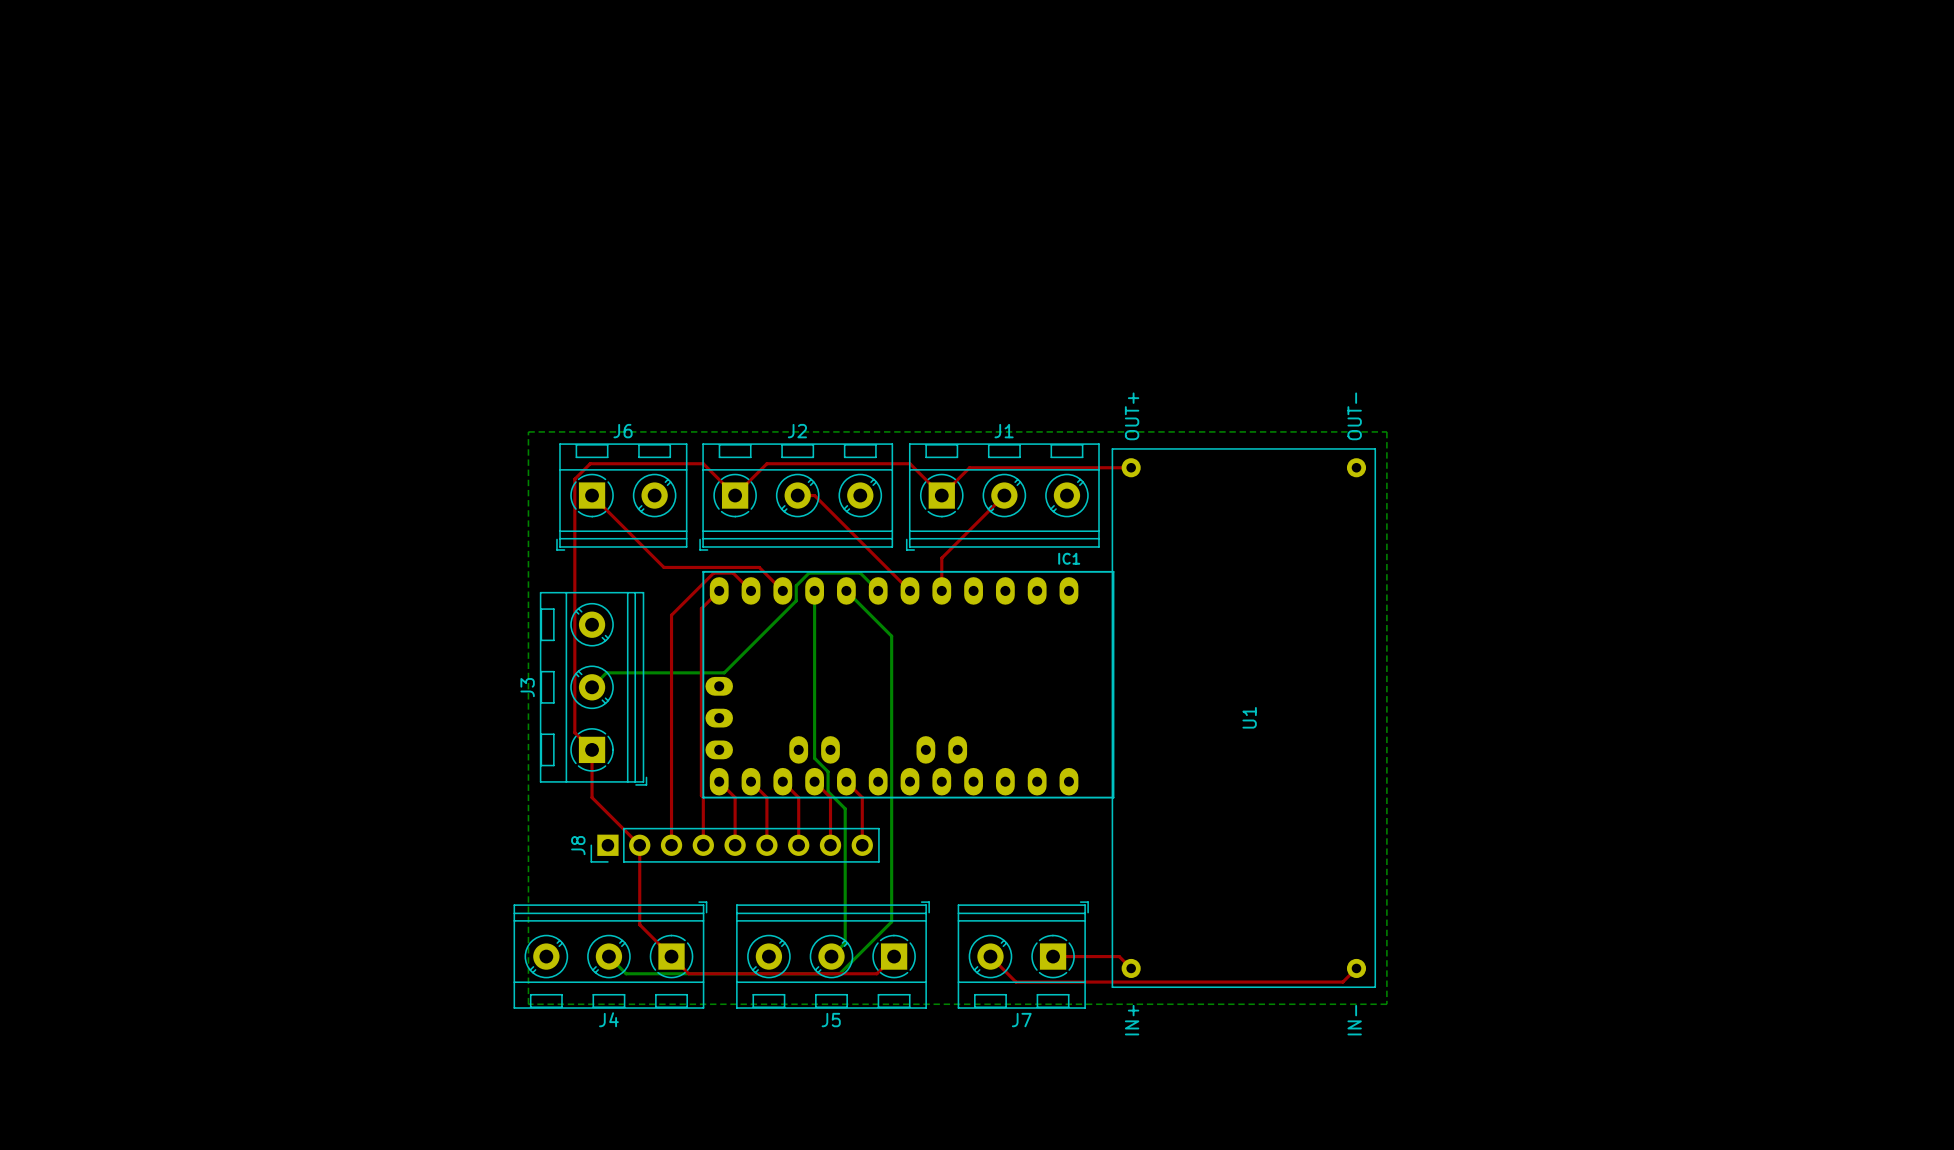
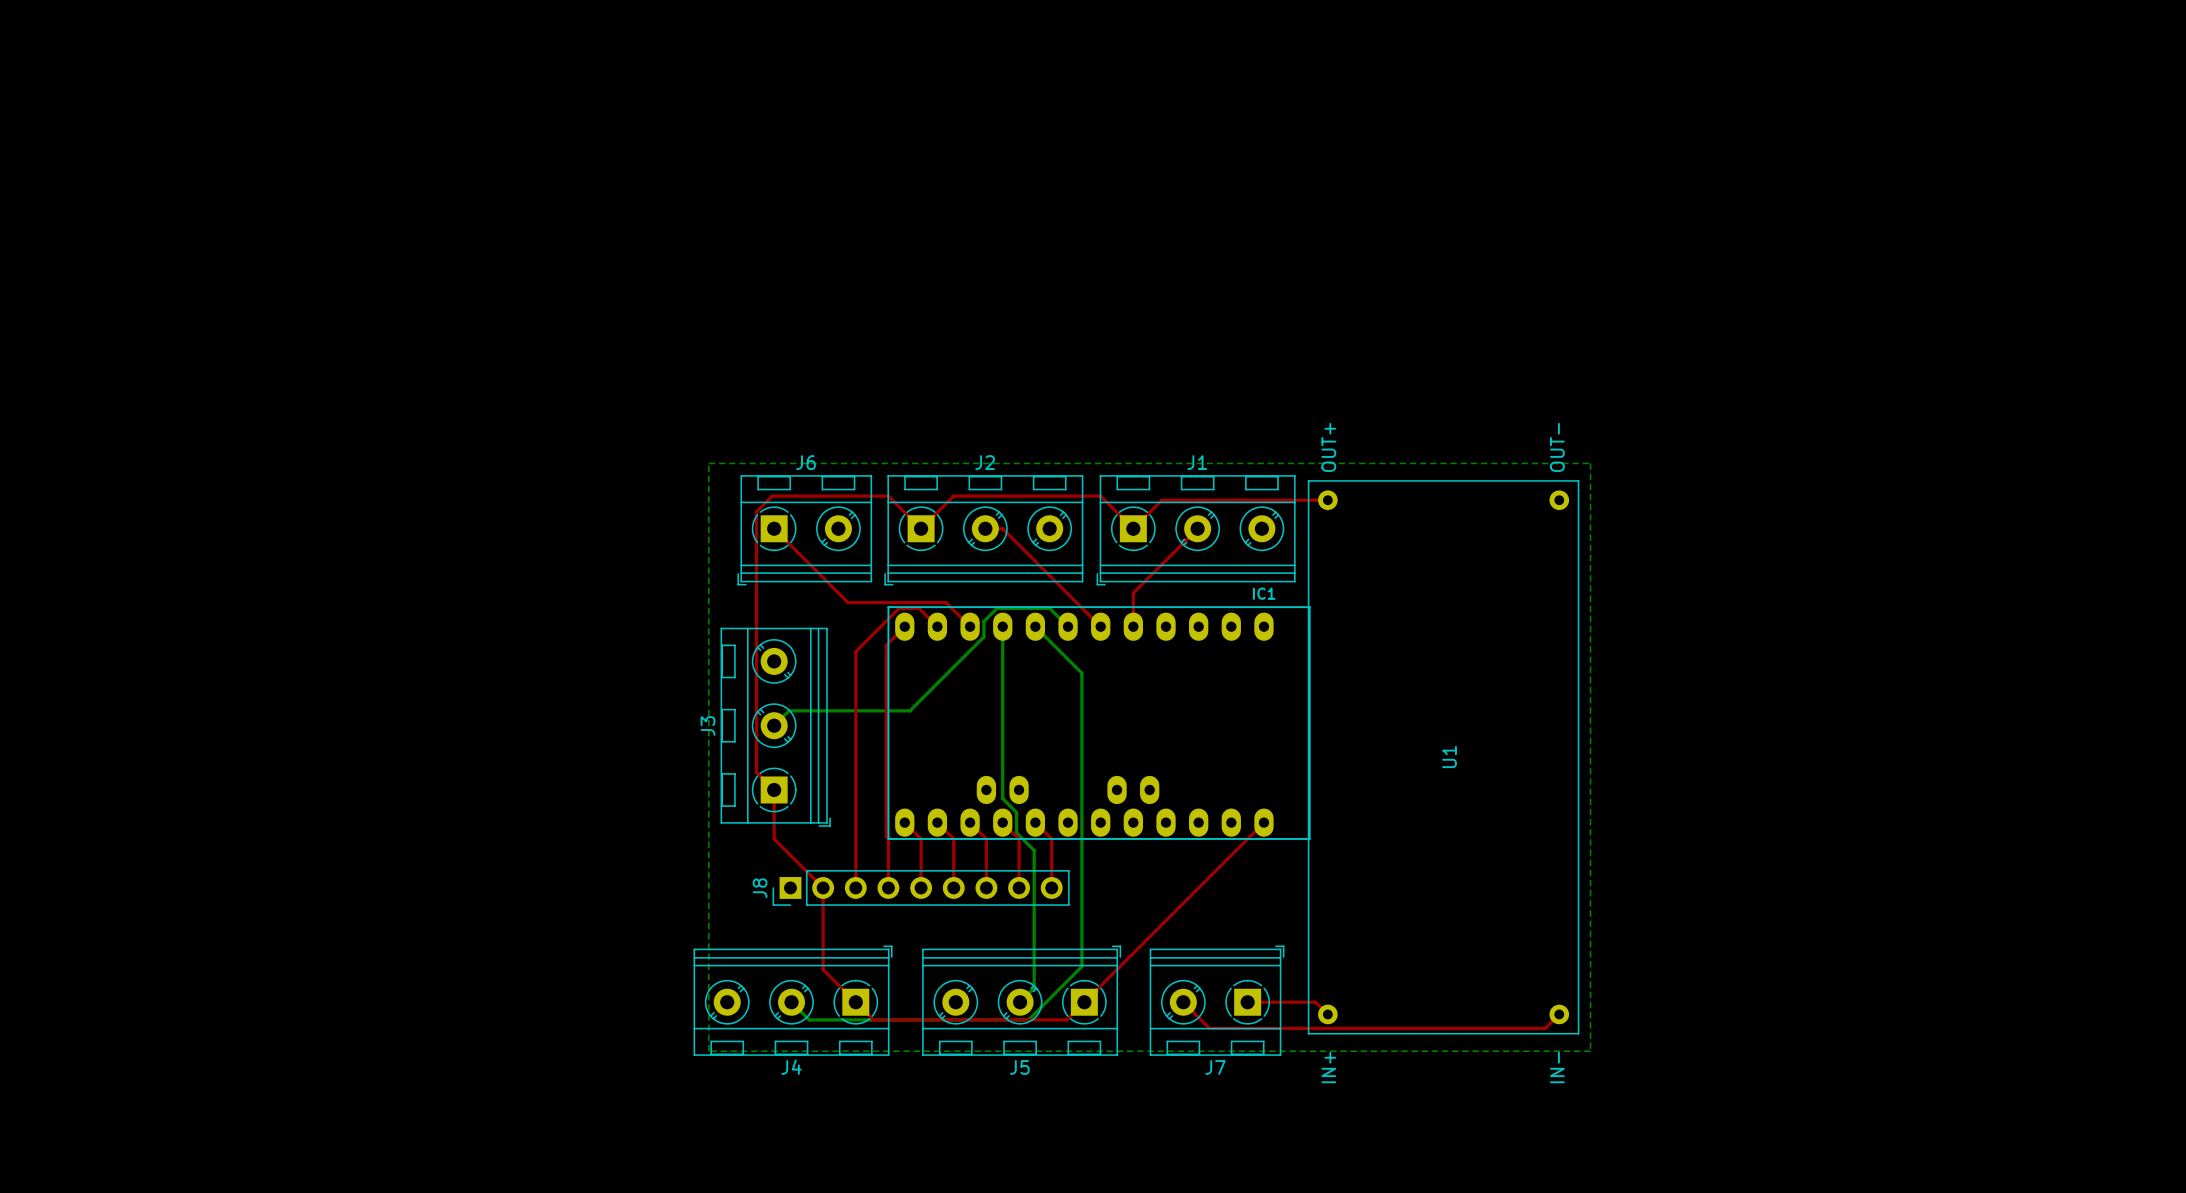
IC1 footprint: [702, 570, 1115, 799] -> [887, 606, 1311, 840]
top track: none -> (1263, 822) (1084, 1002)

